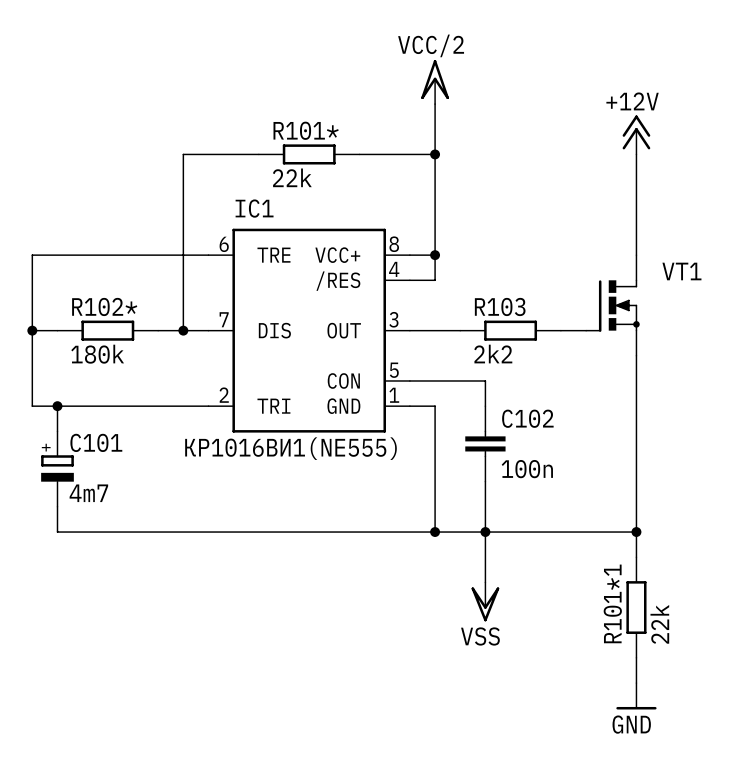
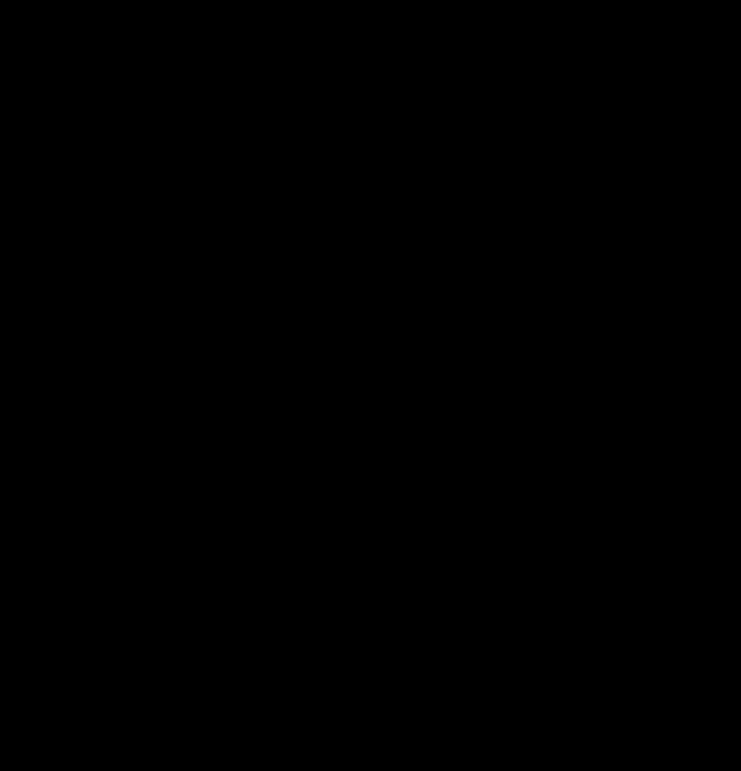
power symbol: VCC/2 (435, 82) -> none
wire: (435, 104) (435, 280) (409, 280) -> none
power symbol: +12V (636, 134) -> none
wire: (258, 154) (183, 154) (183, 330) -> none
R101*: 22k (309, 154) -> none
wire: (359, 154) (435, 154) -> none
junction: (435, 154) -> none
wire: (636, 154) (636, 255) -> none
wire: (208, 255) (32, 255) (32, 406) (208, 406) -> none
wire: (409, 255) (435, 255) -> none
junction: (435, 255) -> none
VT1: (612, 305) -> none
wire: (32, 330) (57, 330) -> none
junction: (32, 330) -> none
R102*: 180k (107, 330) -> none
wire: (158, 330) (208, 330) -> none
junction: (183, 330) -> none
IC1: КР1016ВИ1(NE555) (309, 330) -> none
wire: (409, 330) (460, 330) -> none
R103: 2k2 (510, 330) -> none
wire: (560, 330) (586, 330) -> none
wire: (636, 355) (636, 557) -> none
wire: (409, 380) (485, 380) (485, 406) -> none
wire: (57, 406) (57, 431) -> none
junction: (57, 406) -> none
wire: (409, 406) (435, 406) (435, 532) -> none
C102: 100n (485, 443) -> none
C101: 4m7 (57, 469) -> none
wire: (485, 481) (485, 582) -> none
wire: (57, 506) (57, 532) (636, 532) -> none
junction: (435, 532) -> none
junction: (485, 532) -> none
junction: (636, 532) -> none
power symbol: VSS (485, 601) -> none
R101*1: 22k (636, 607) -> none
wire: (636, 657) (636, 683) -> none
power symbol: GND (636, 696) -> none

